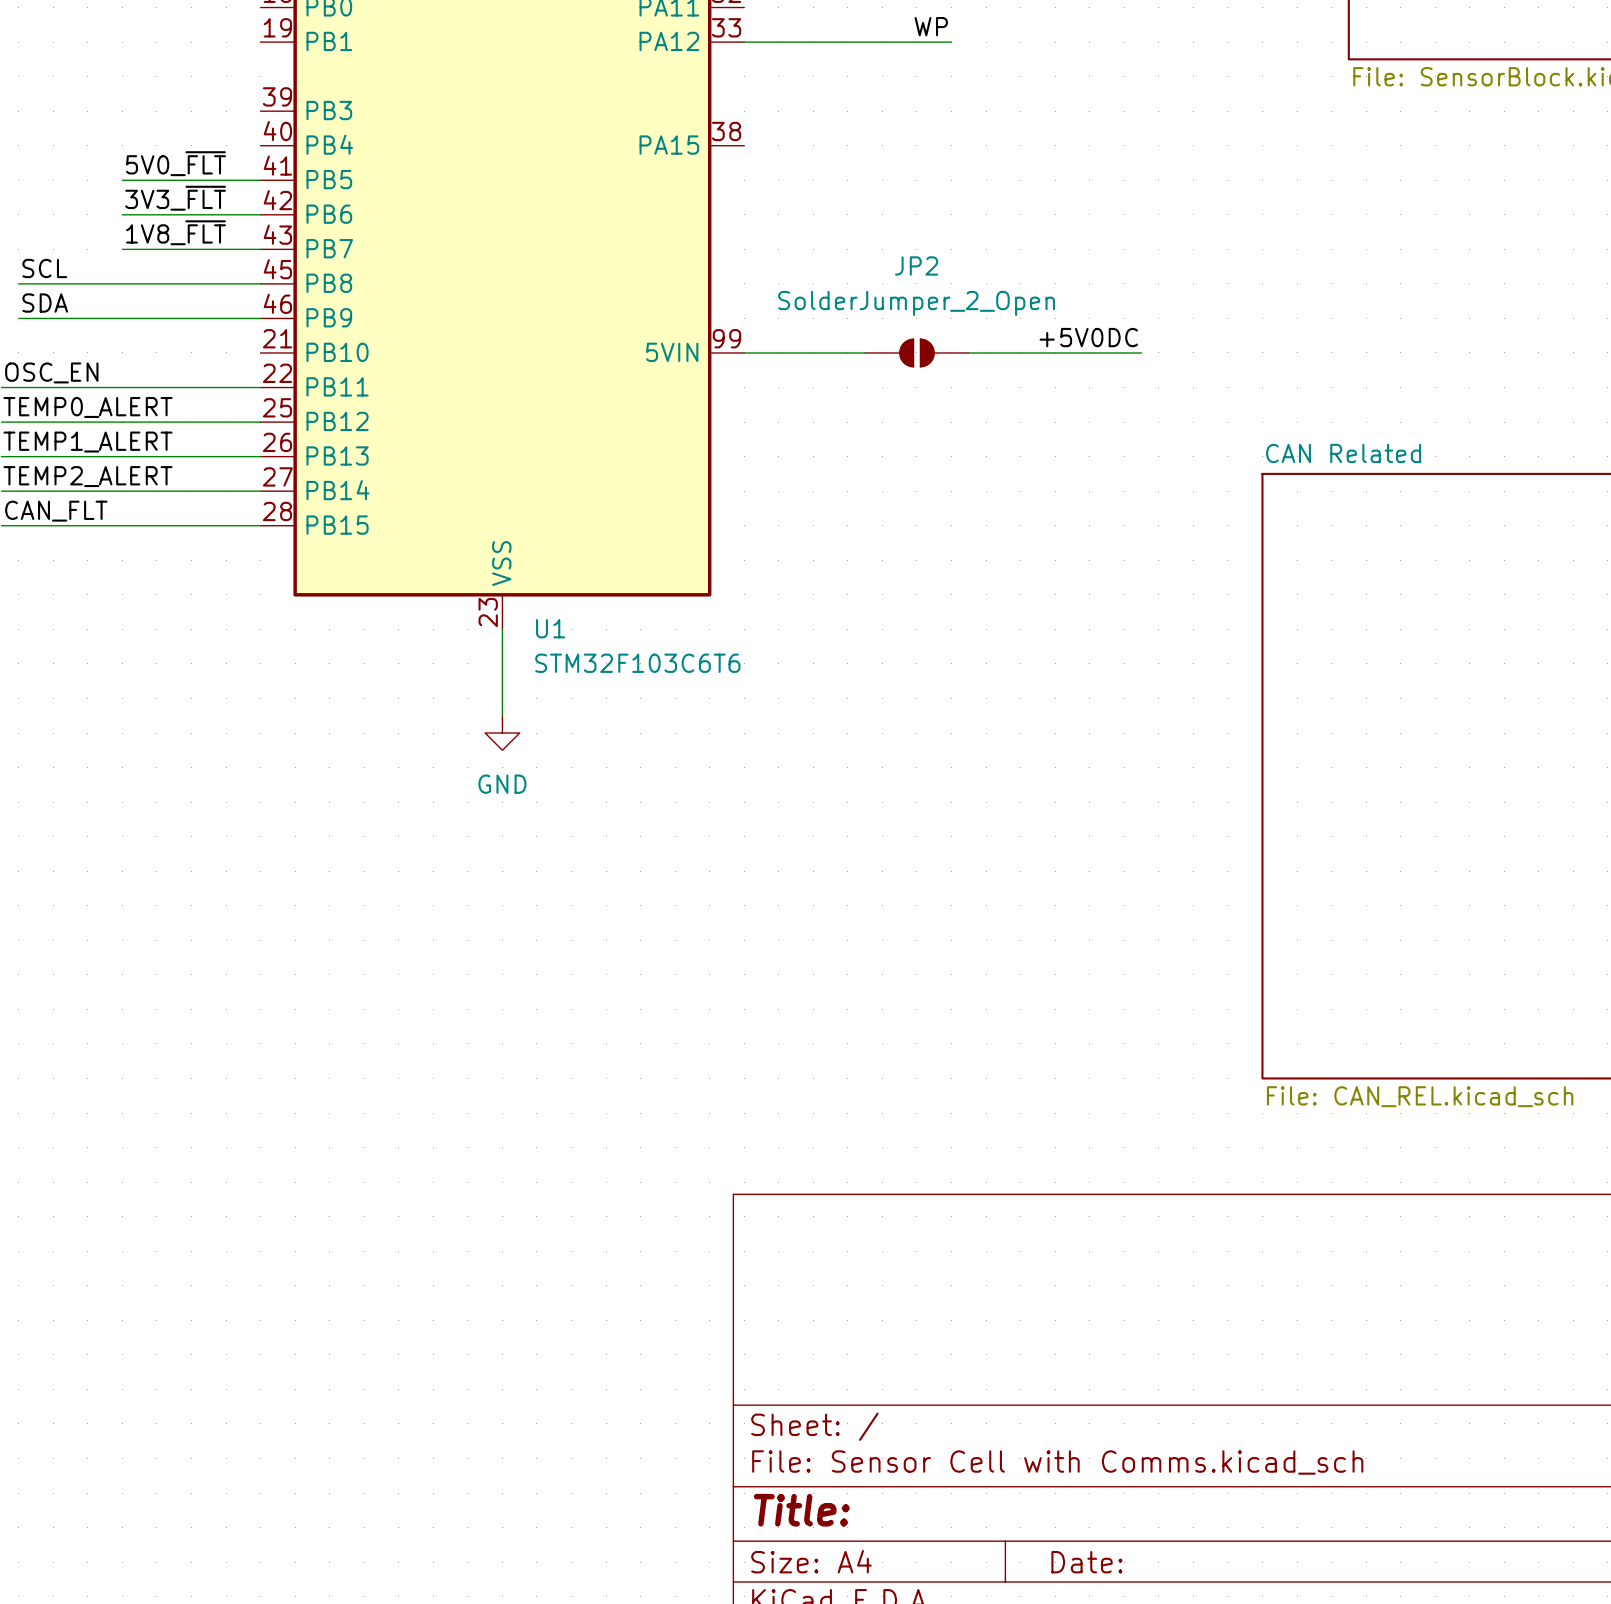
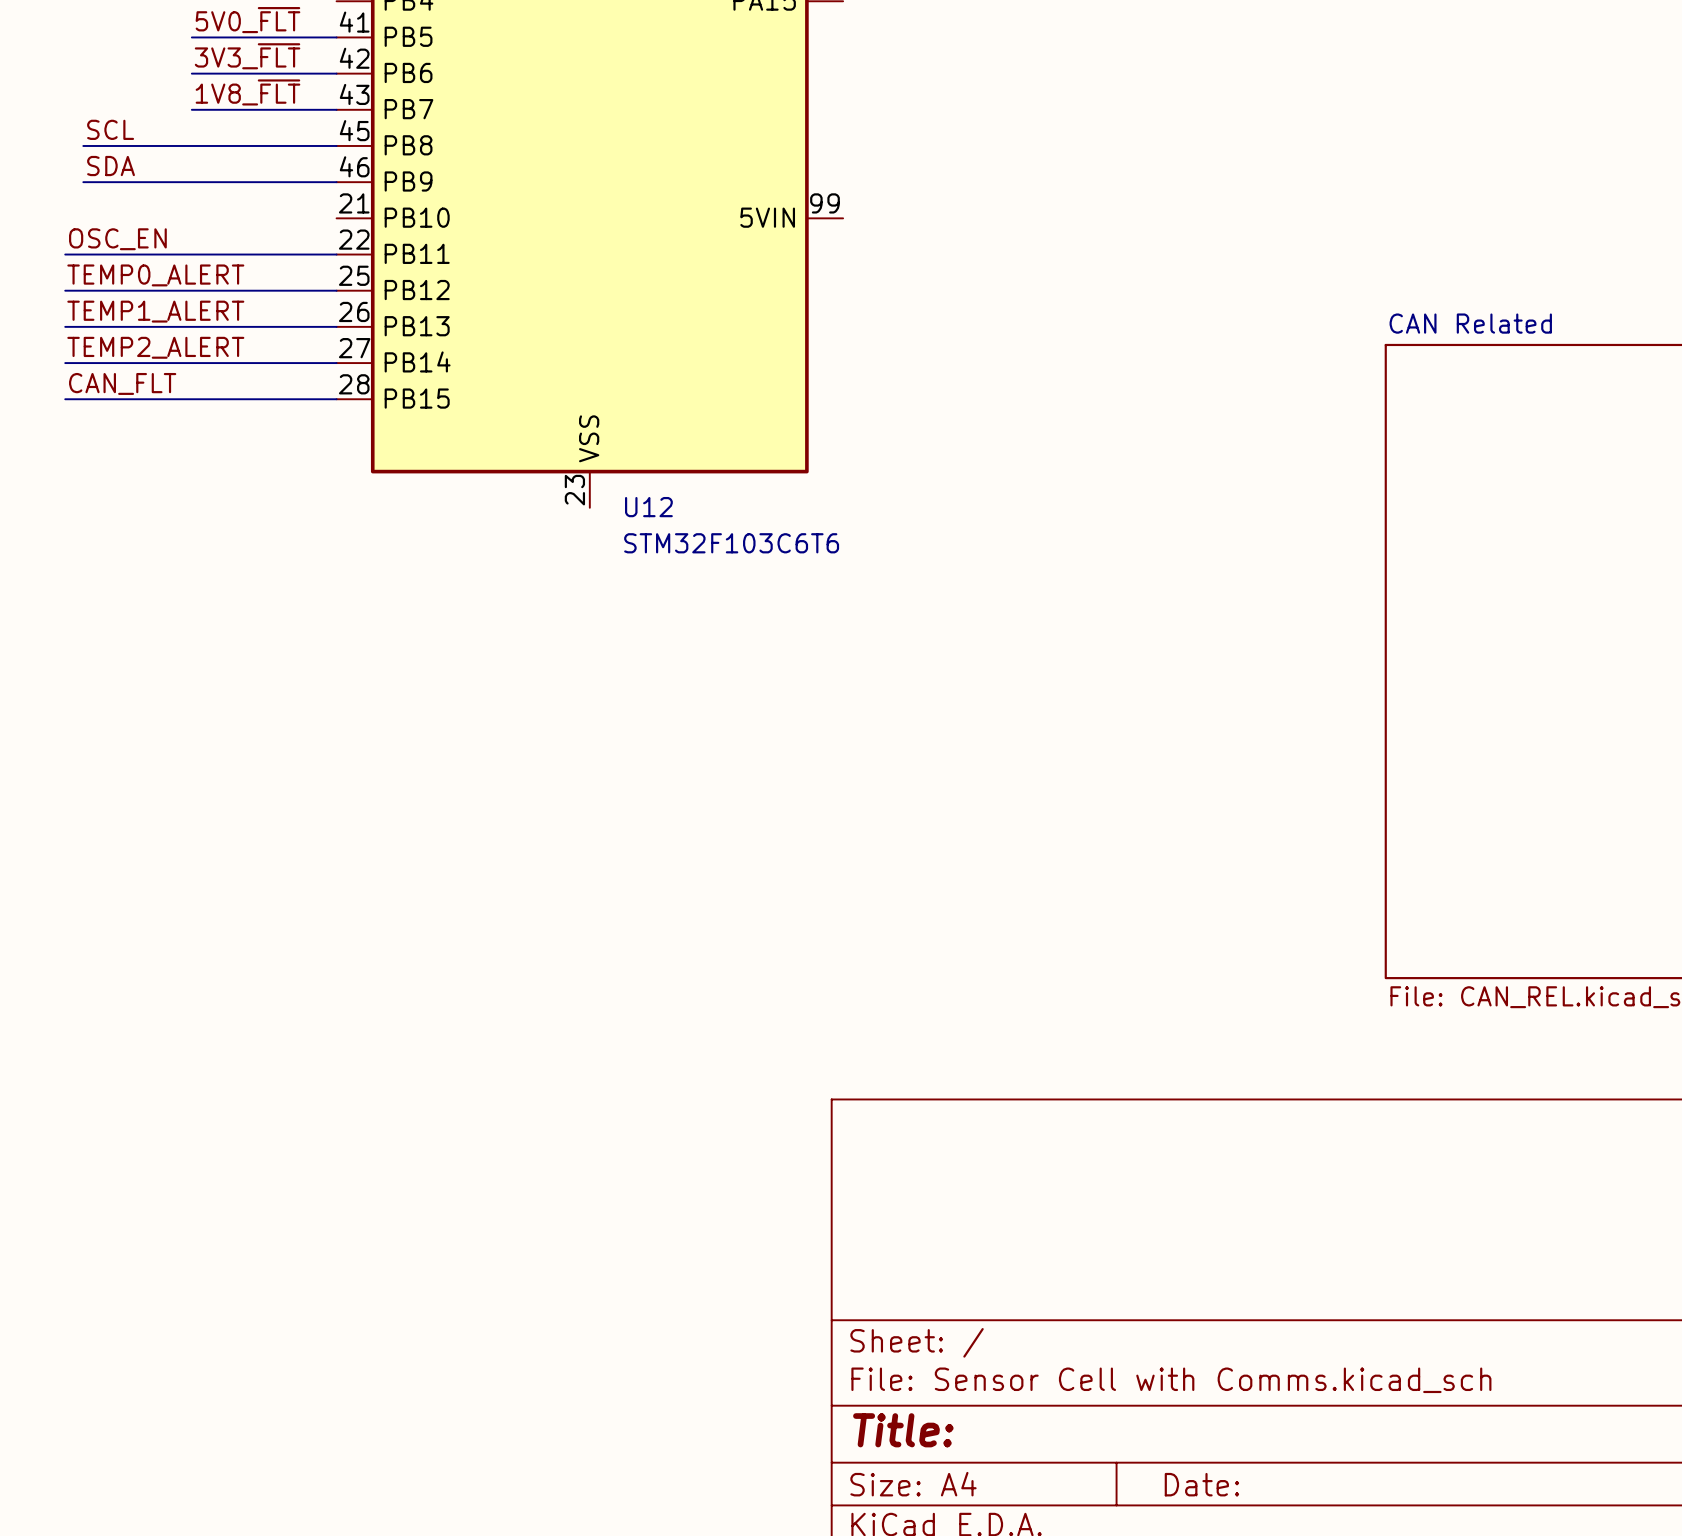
label: +5V0DC (1088, 337) -> none
wire: (744, 352) (865, 352) -> none
JP2: SolderJumper_2_Open (916, 352) -> none
wire: (968, 352) (1141, 352) -> none
U1 name: U1 (550, 628) -> U12 (648, 507)
wire: (502, 629) (502, 715) -> none
power symbol: GND (502, 733) -> none

